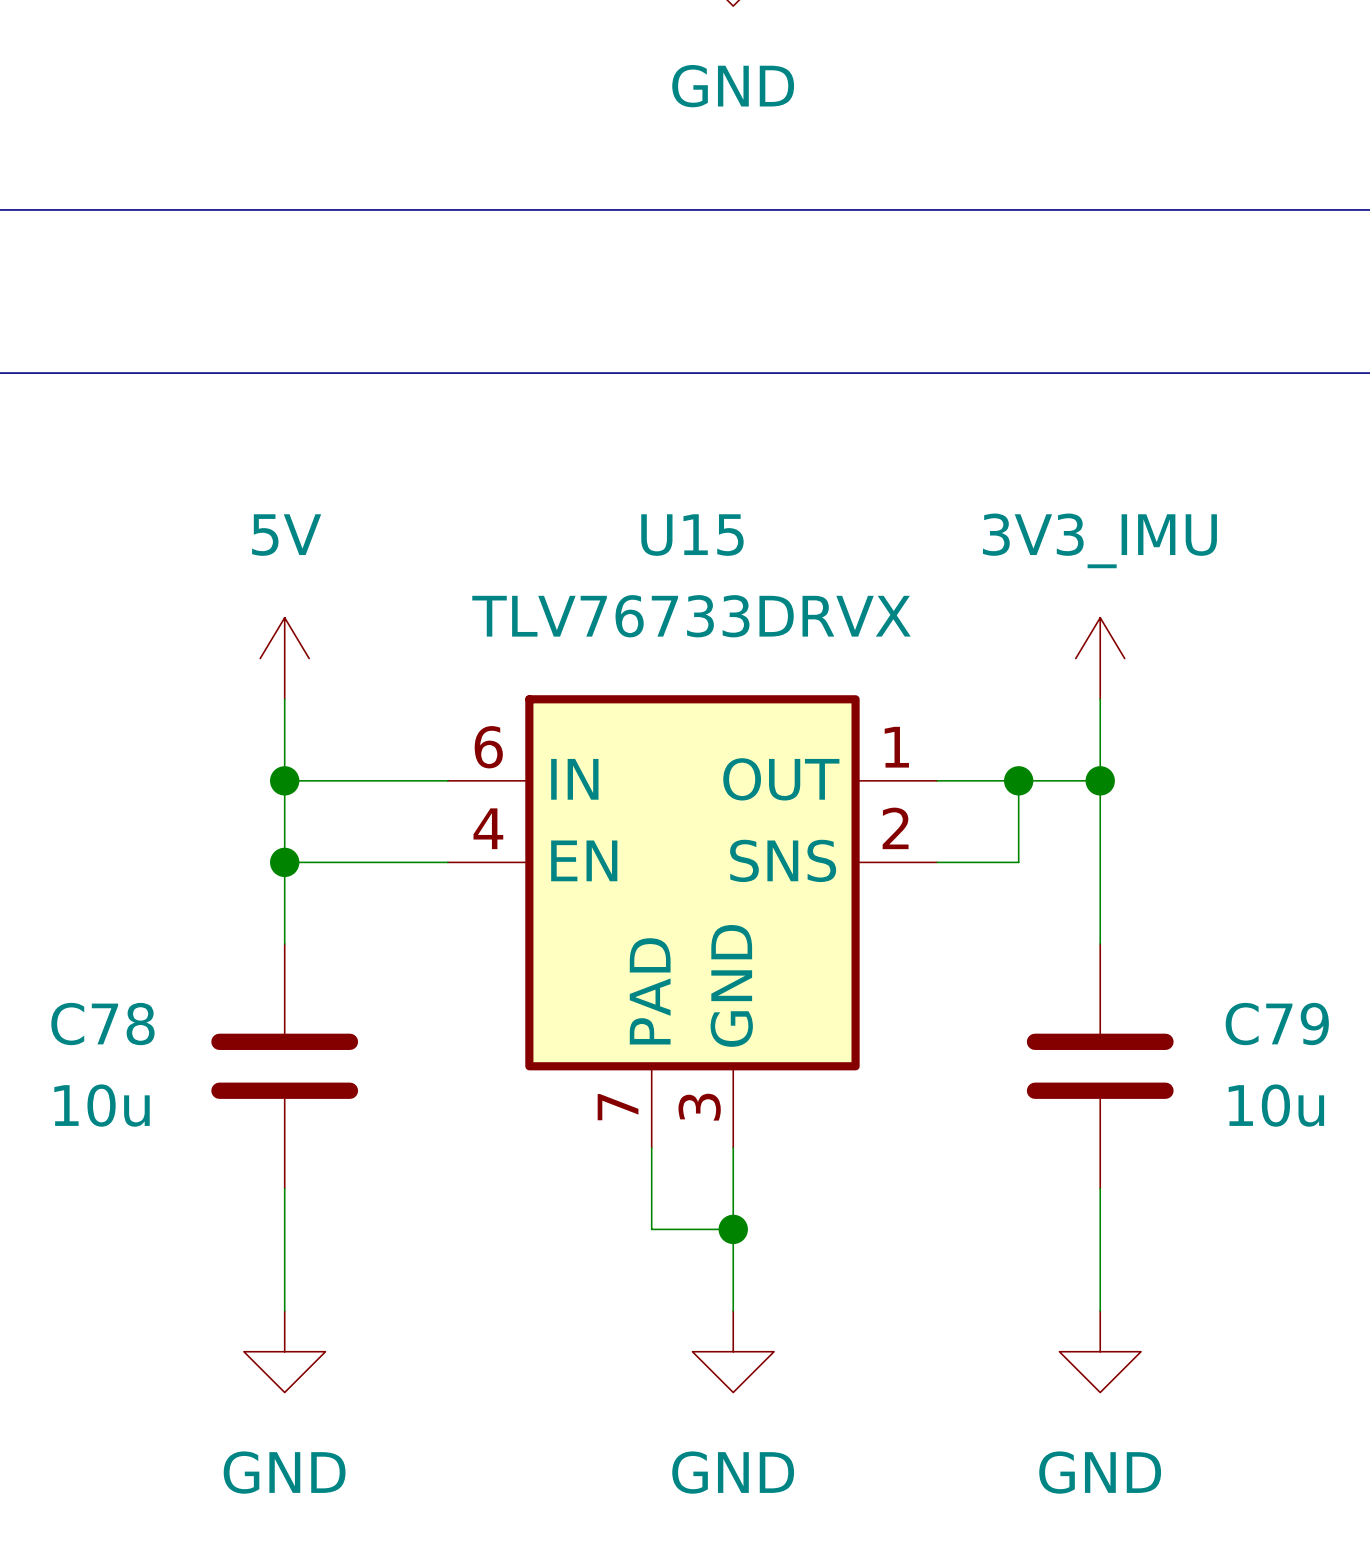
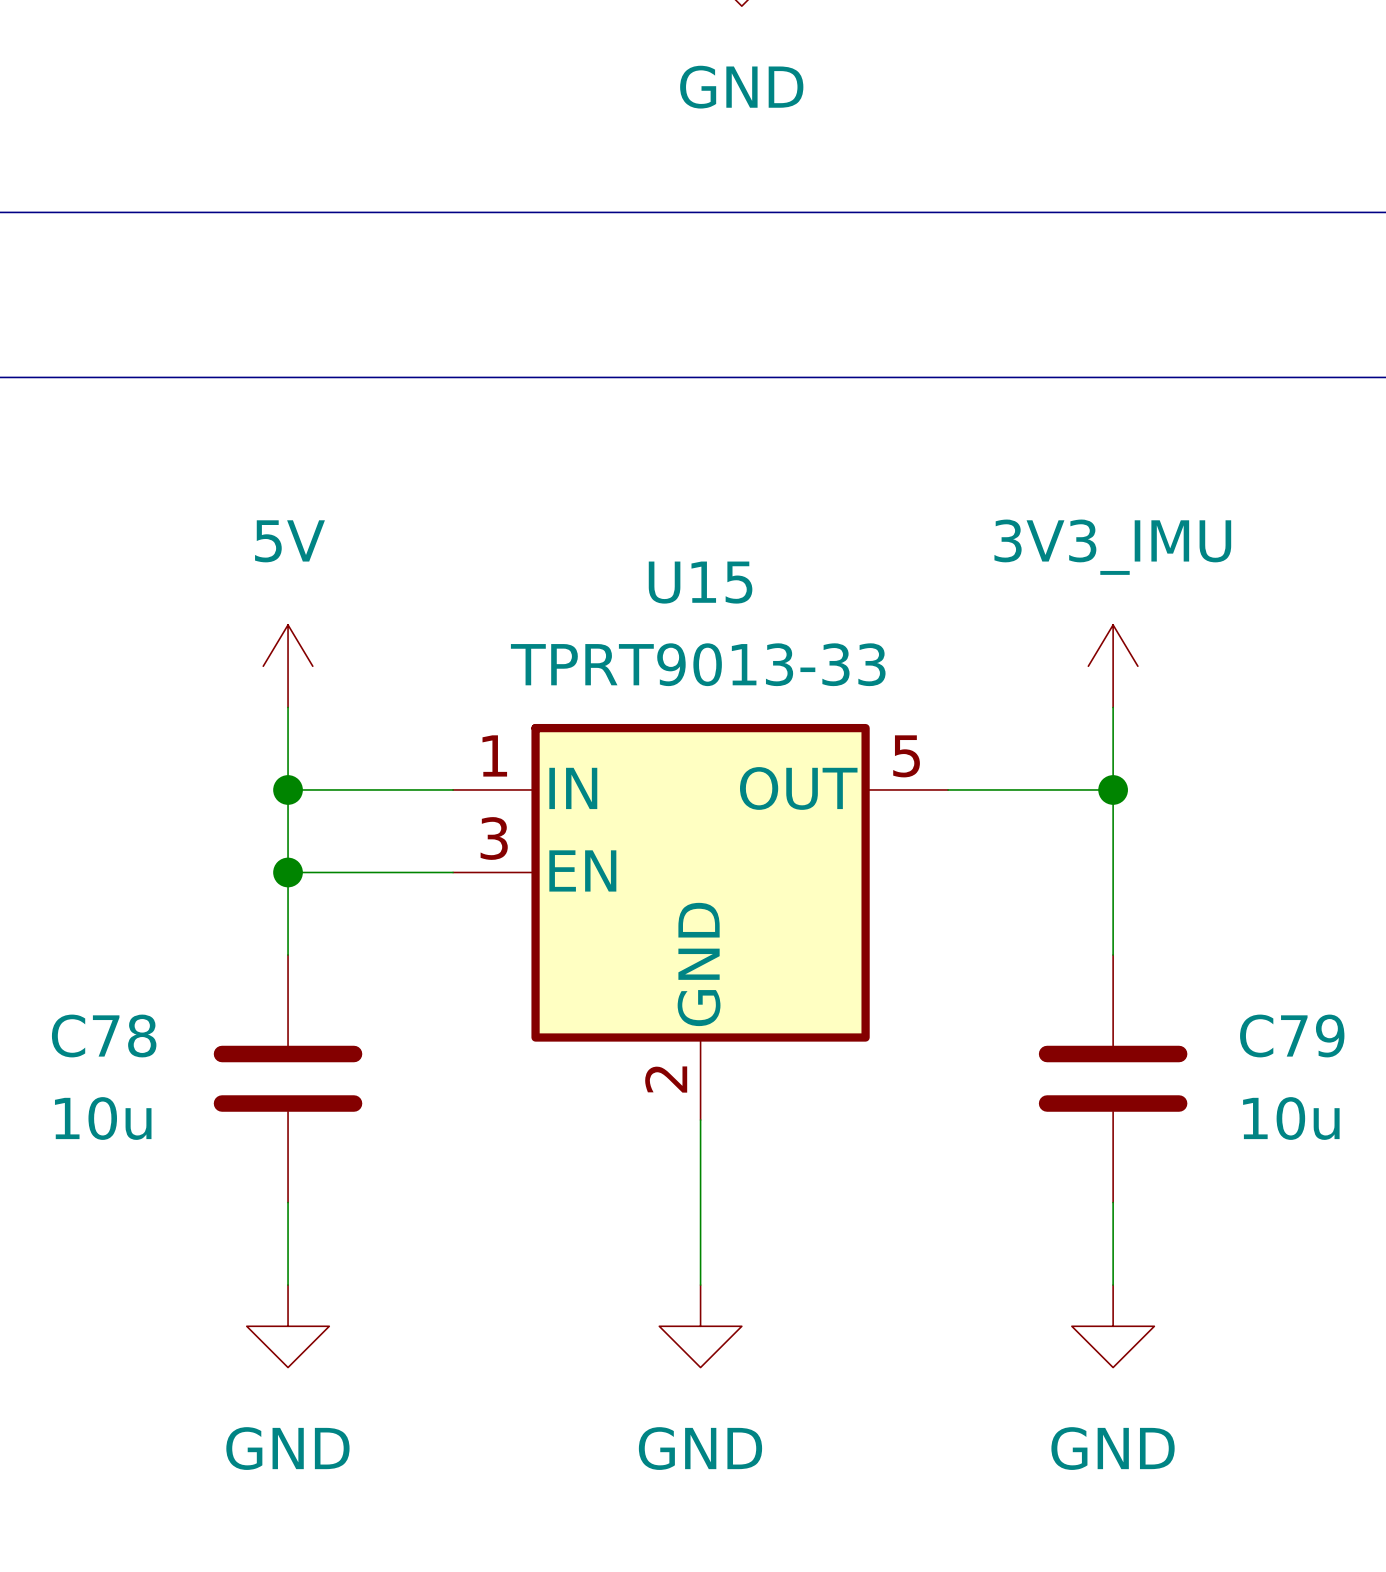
U15 value: TLV76733DRVX (691, 616) -> TPRT9013-33 (698, 664)
U15 symbol: [447, 695, 938, 1148] -> [453, 723, 949, 1121]
wire: (1018, 780) (1018, 862) (937, 862) -> none
junction: (1018, 780) -> none
wire: (651, 1147) (651, 1229) (733, 1229) -> none
wire: (733, 1147) (733, 1310) -> (700, 1120) (700, 1285)
junction: (733, 1229) -> none
power symbol position: GND (284, 1351) -> GND (288, 1326)
power symbol position: GND (733, 1351) -> GND (700, 1326)
power symbol position: GND (1100, 1351) -> GND (1113, 1326)

